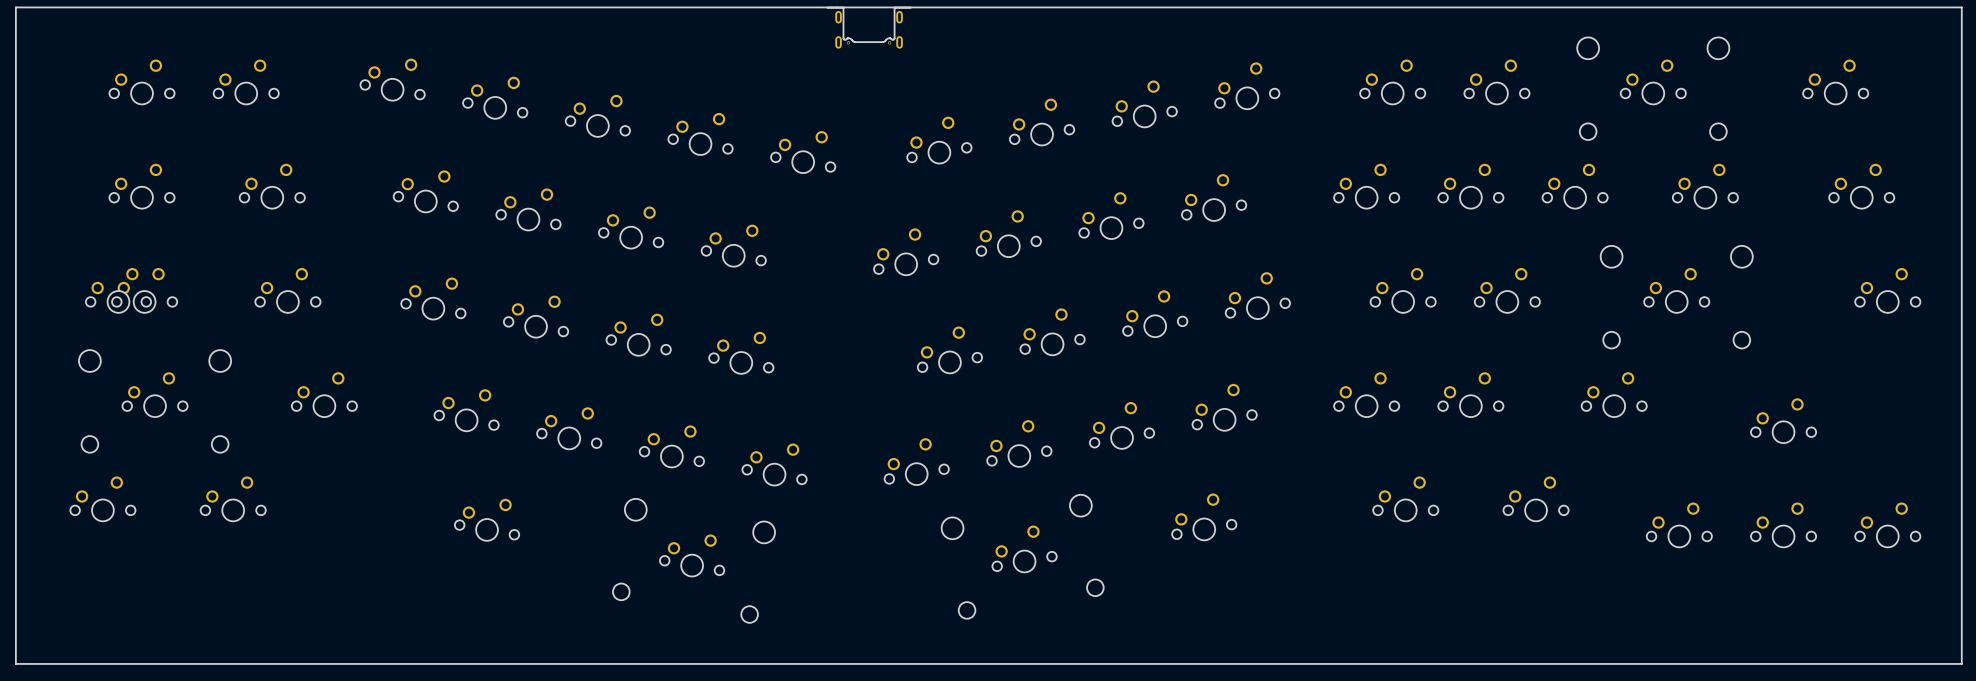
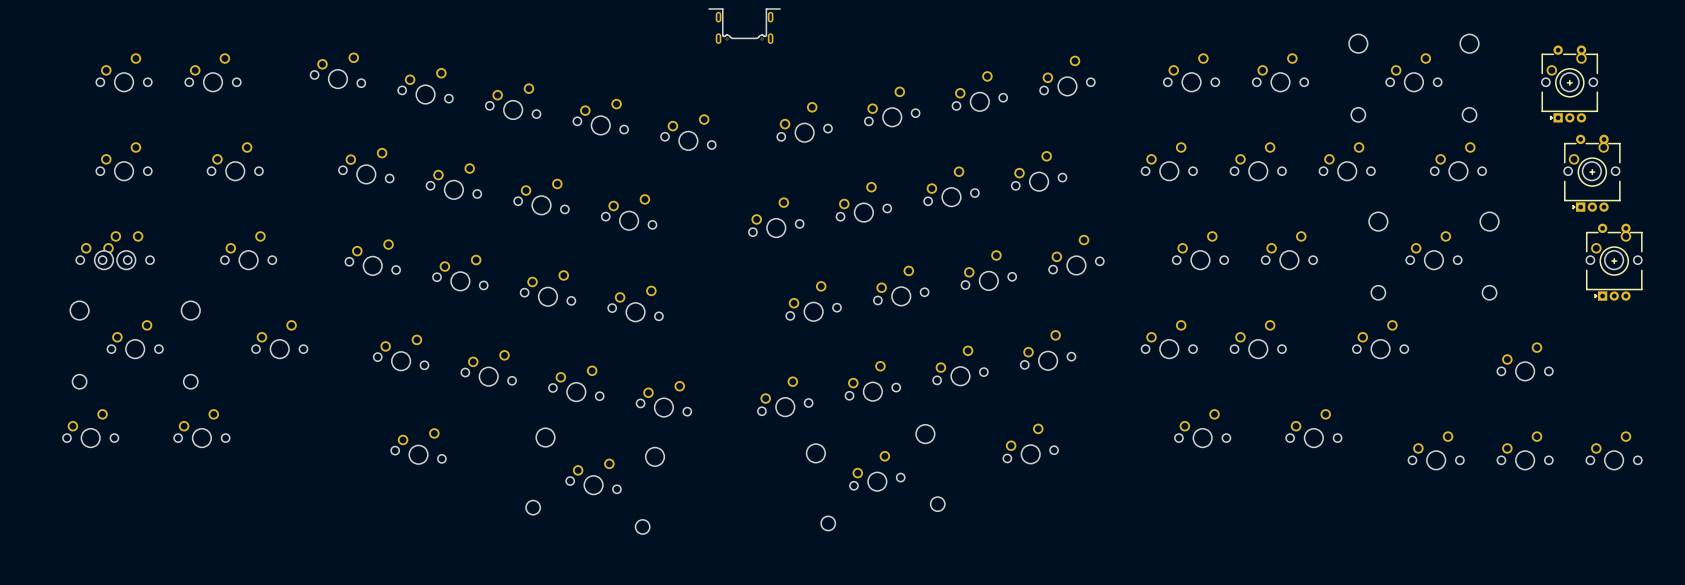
board edge: (15, 7) (1961, 7) (1961, 663) (15, 663) (15, 7) -> none
part: none -> (1569, 83)
part: none -> (1592, 173)
part: none -> (1614, 262)

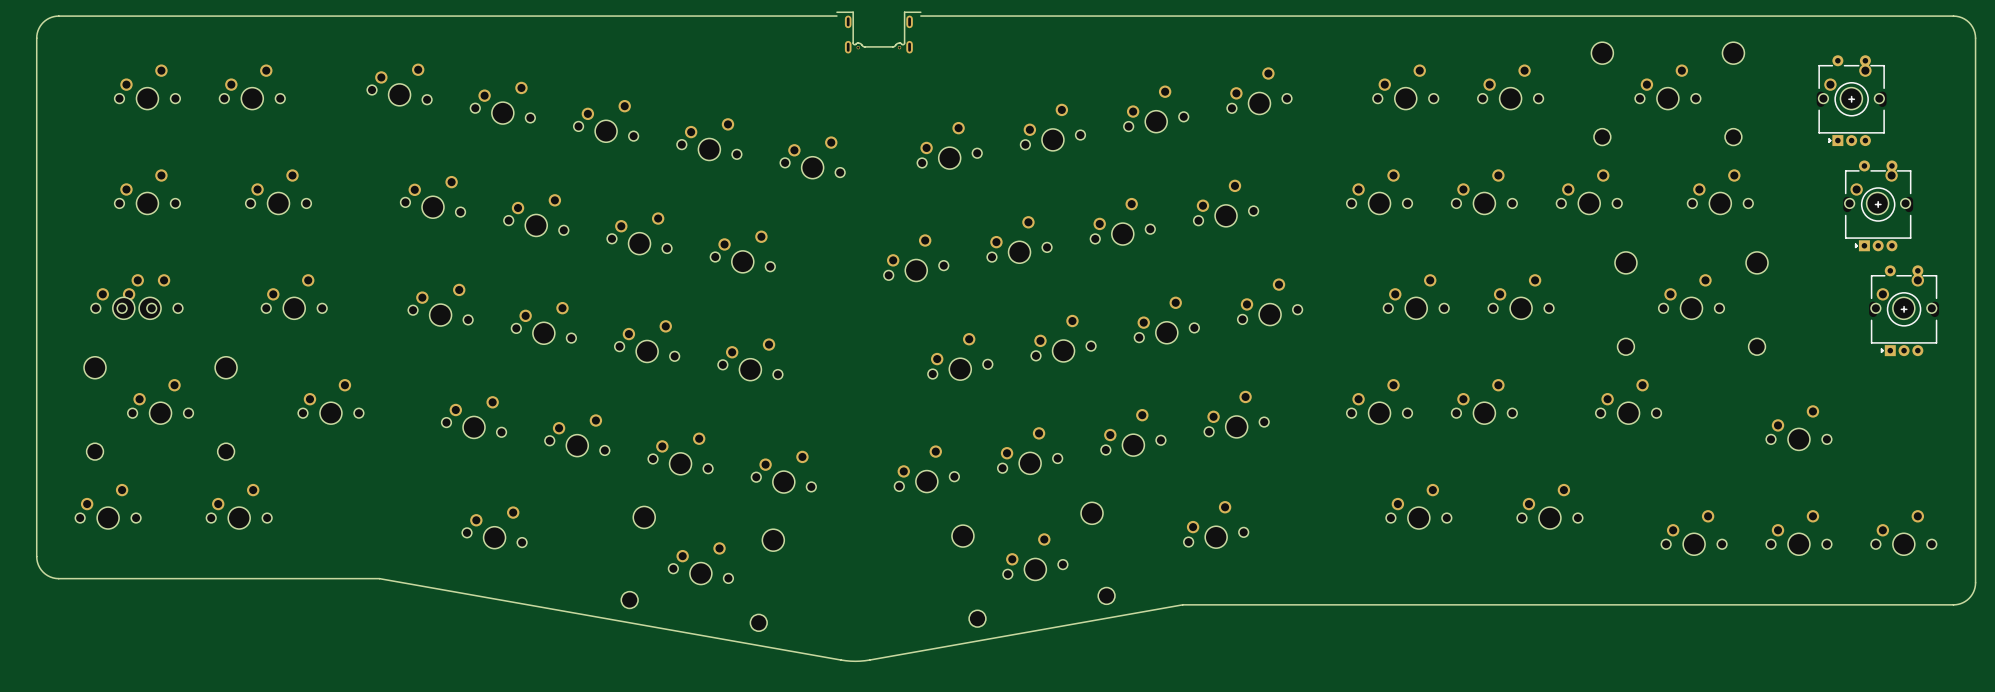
board edge: none -> (836, 16) (58, 16) (47, 19) (40, 26) (36, 38) (36, 556) (41, 570) (50, 576) (58, 578) (379, 578) (855, 661) (1182, 604) (1953, 604) (1965, 601) (1973, 592) (1975, 582) (1975, 38) (1972, 27) (1964, 19) (1953, 16) (920, 16)

